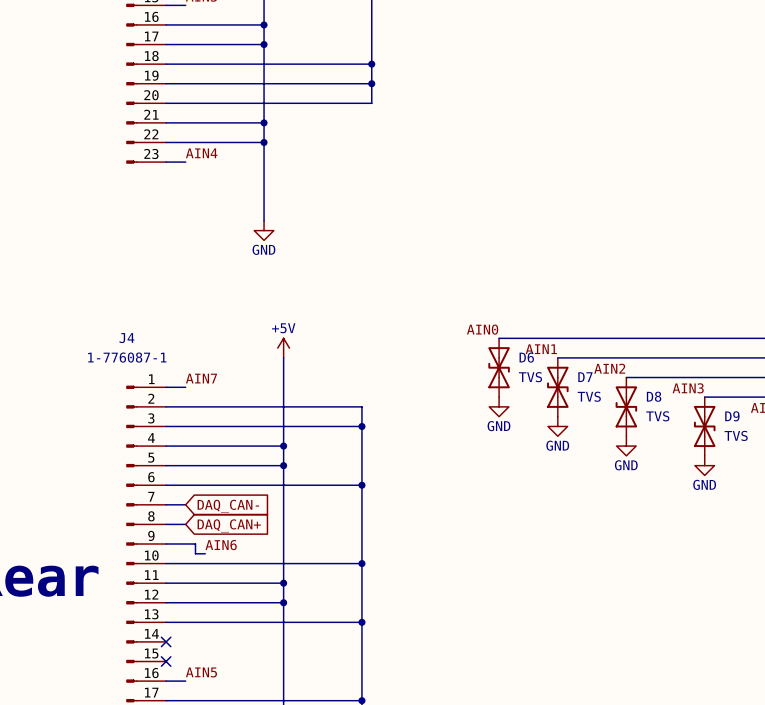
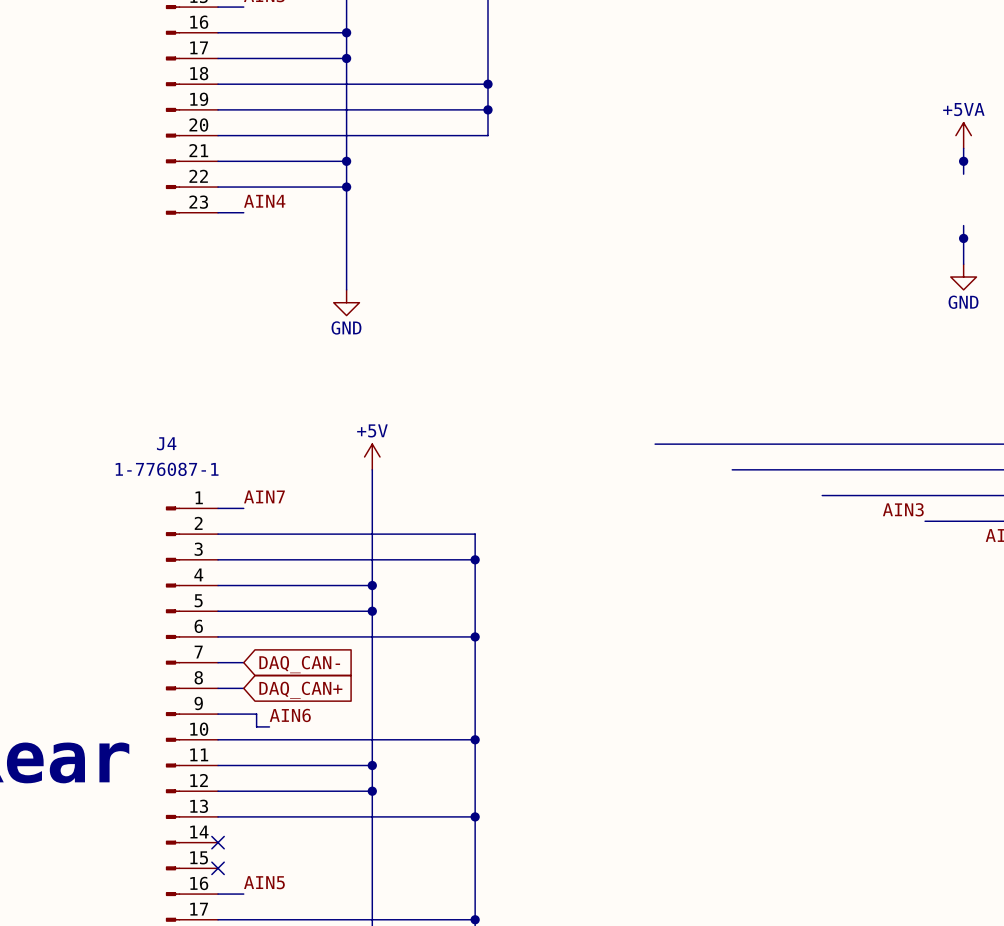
power symbol: none -> +5VA (963, 135)
wire: none -> (963, 148) (963, 174)
junction: none -> (963, 161)
wire: none -> (963, 225) (963, 264)
junction: none -> (963, 238)
power symbol: none -> GND (963, 277)
label: AIN0 (482, 329) -> none
label: AIN1 (541, 349) -> none
D6: TVS (499, 367) -> none
label: AIN2 (609, 368) -> none
D7: TVS (557, 387) -> none
power symbol: GND (499, 406) -> none
D8: TVS (626, 406) -> none
power symbol: GND (557, 426) -> none
D9: TVS (704, 426) -> none
power symbol: GND (626, 446) -> none
power symbol: GND (704, 465) -> none

